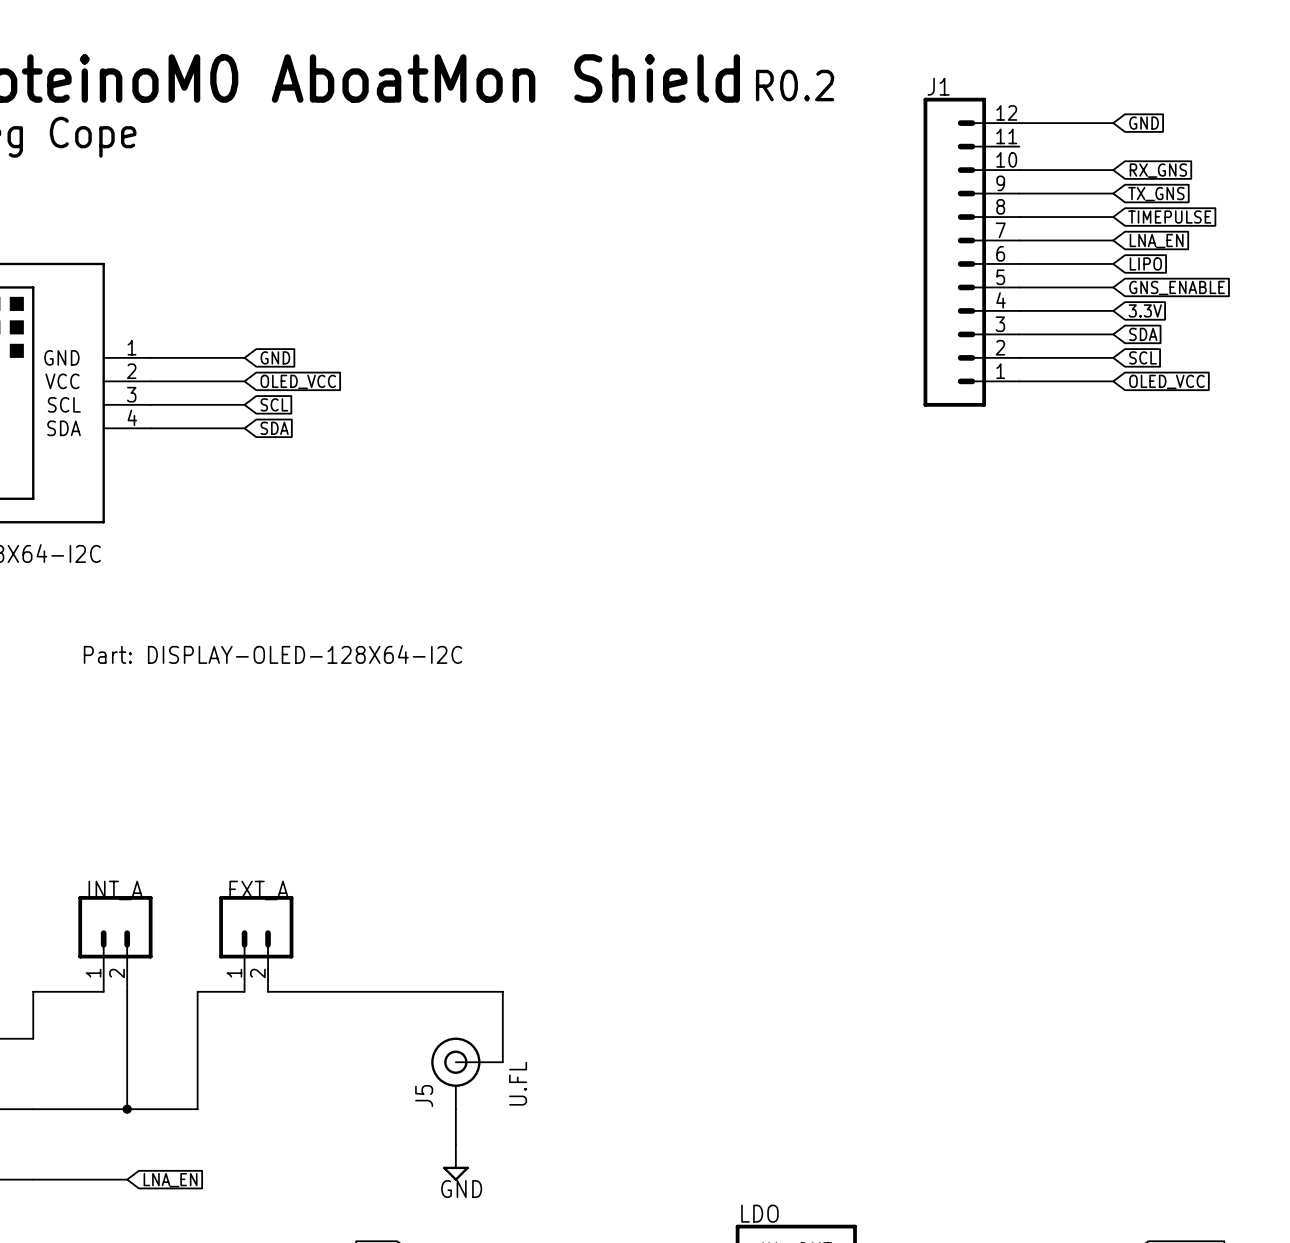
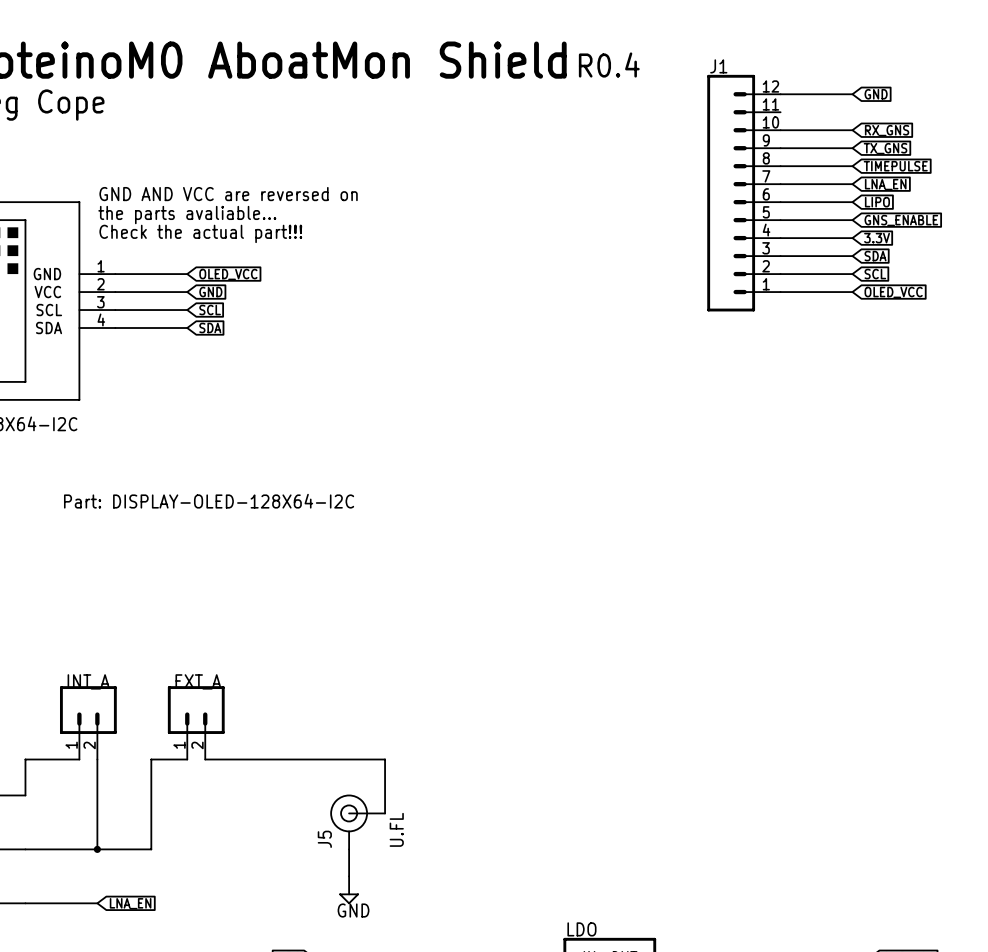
text: R0.2 (795, 85) -> R0.4 (609, 64)
text: none -> GND AND VCC are reversed on (228, 194)
text: none -> the parts avaliable... (187, 215)
text: none -> Check the actual part!!! (200, 233)
global label: GND (275, 357) -> OLED_VCC (228, 274)
global label: OLED_VCC (298, 381) -> GND (210, 292)

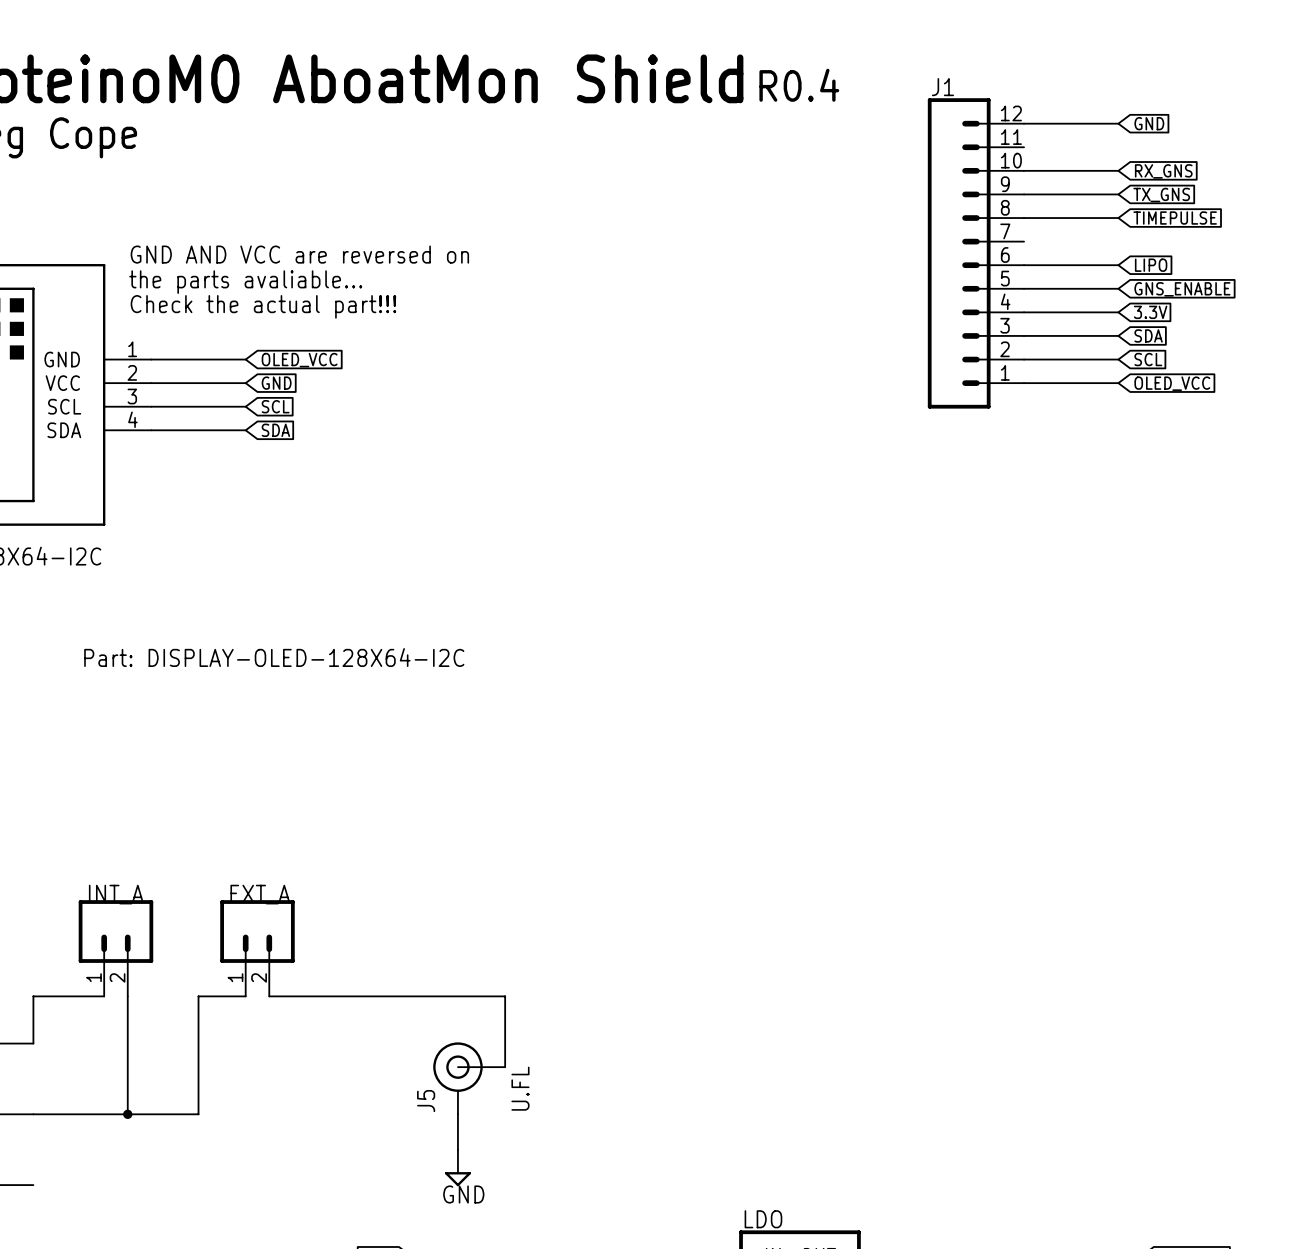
wire: (780, 184) (852, 184) -> none
global label: LNA_EN (885, 184) -> none
wire: (25, 903) (97, 903) -> none
global label: LNA_EN (130, 903) -> none

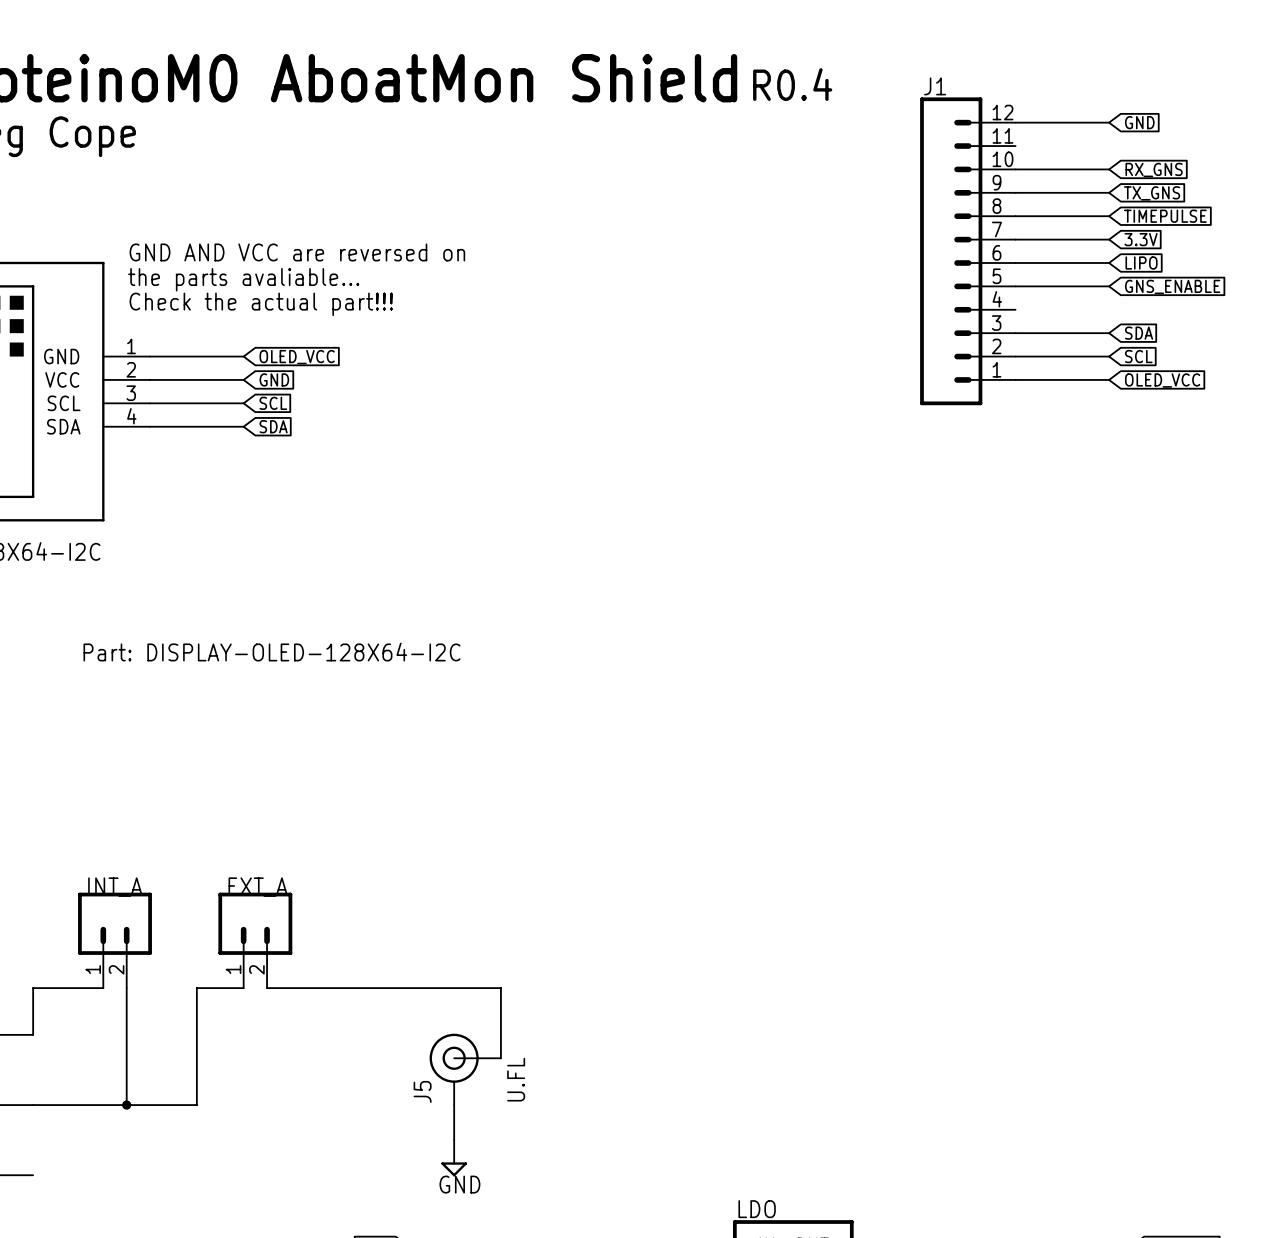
wire: (1024, 312) (1118, 312) -> (1015, 239) (1109, 239)
global label position: 3.3V (1150, 312) -> 3.3V (1141, 239)

